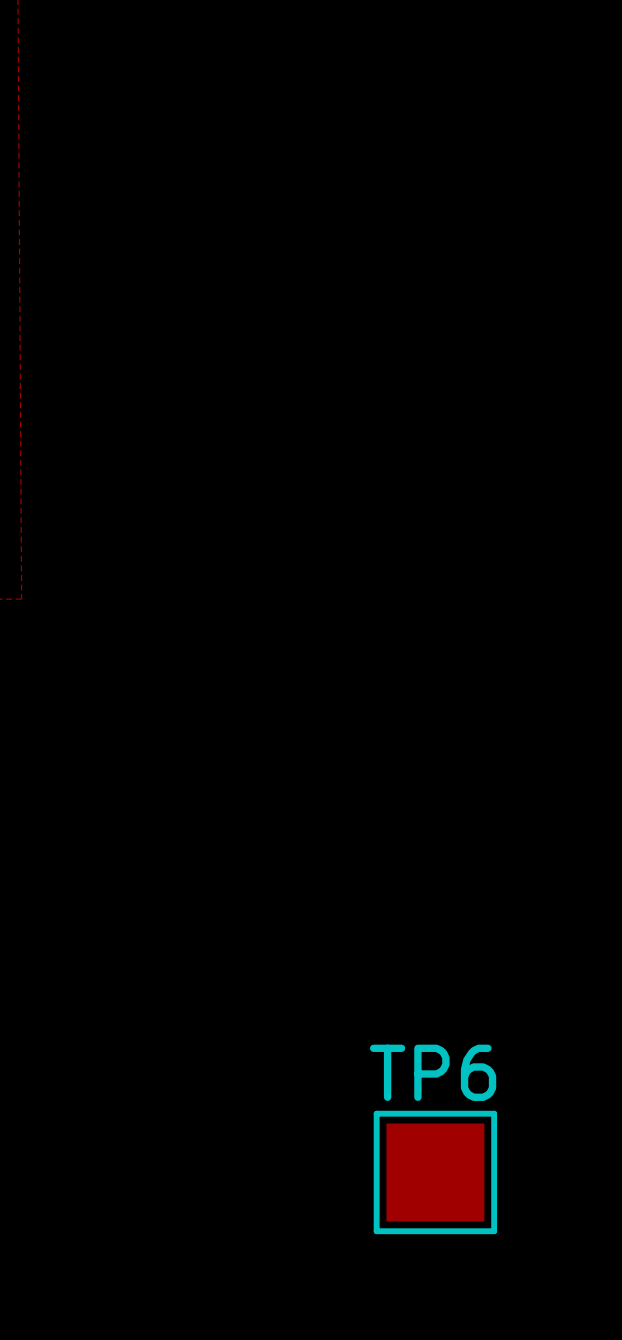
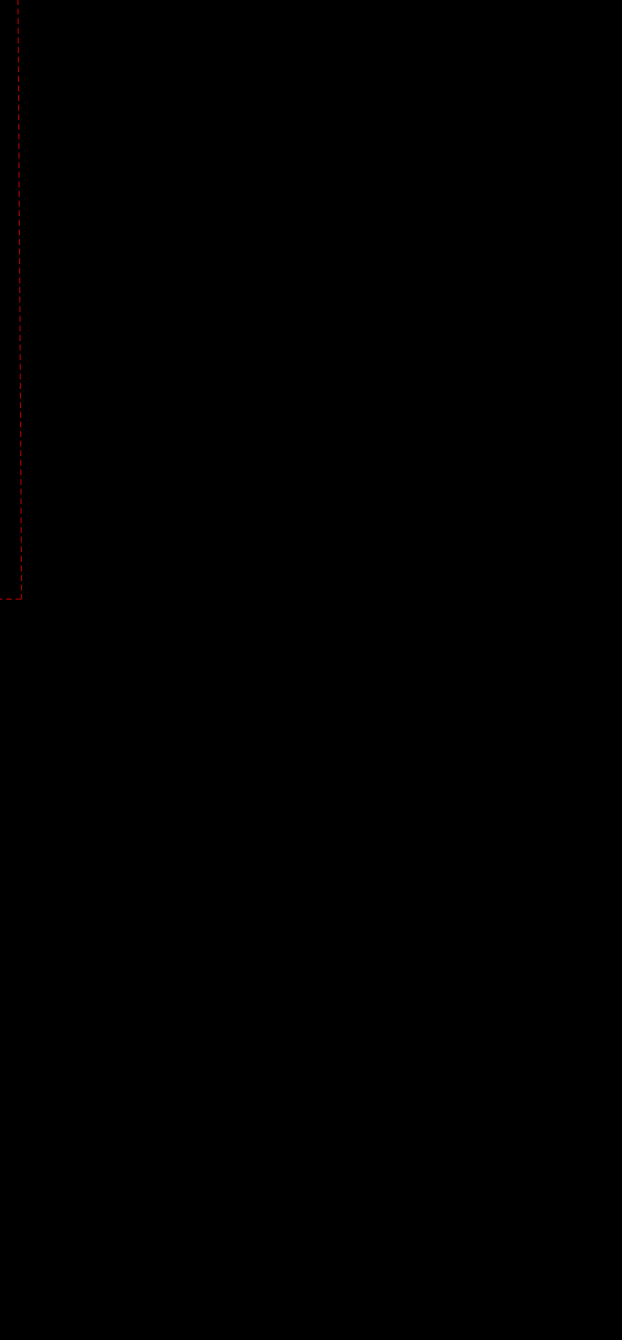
TP6: (435, 1172) -> none

